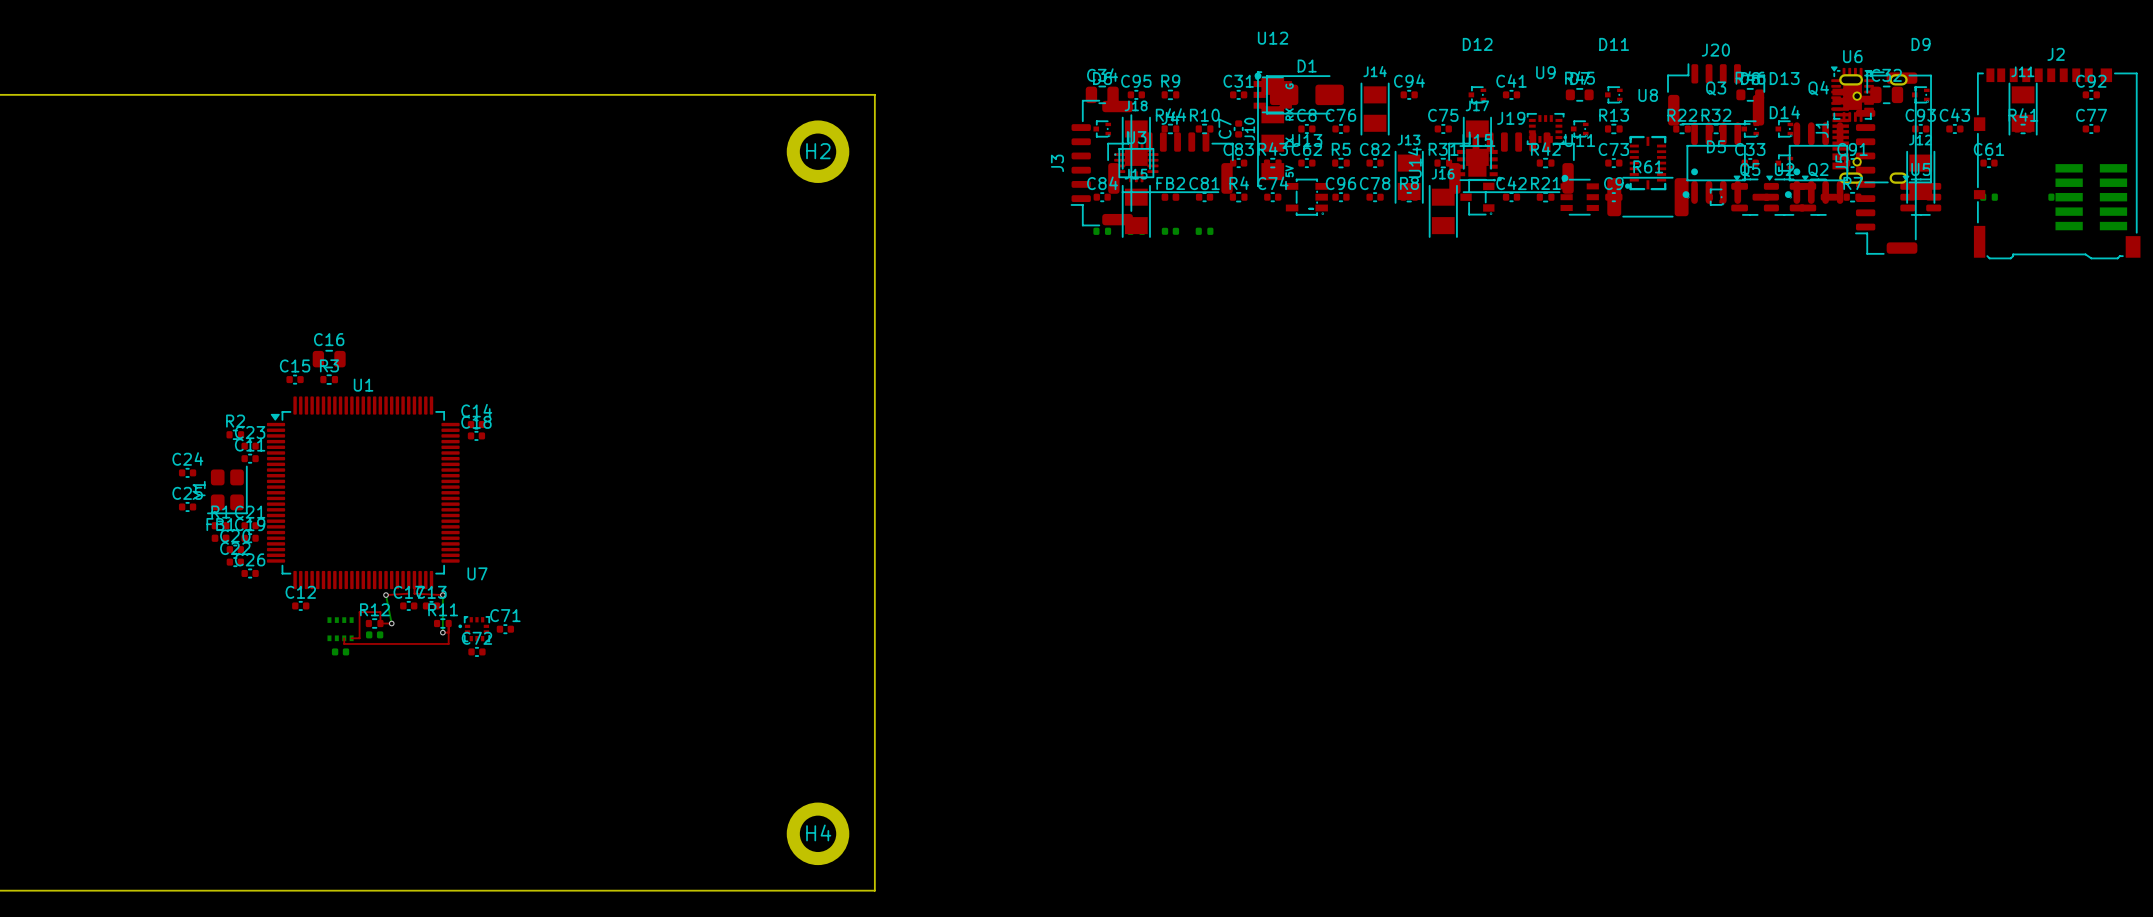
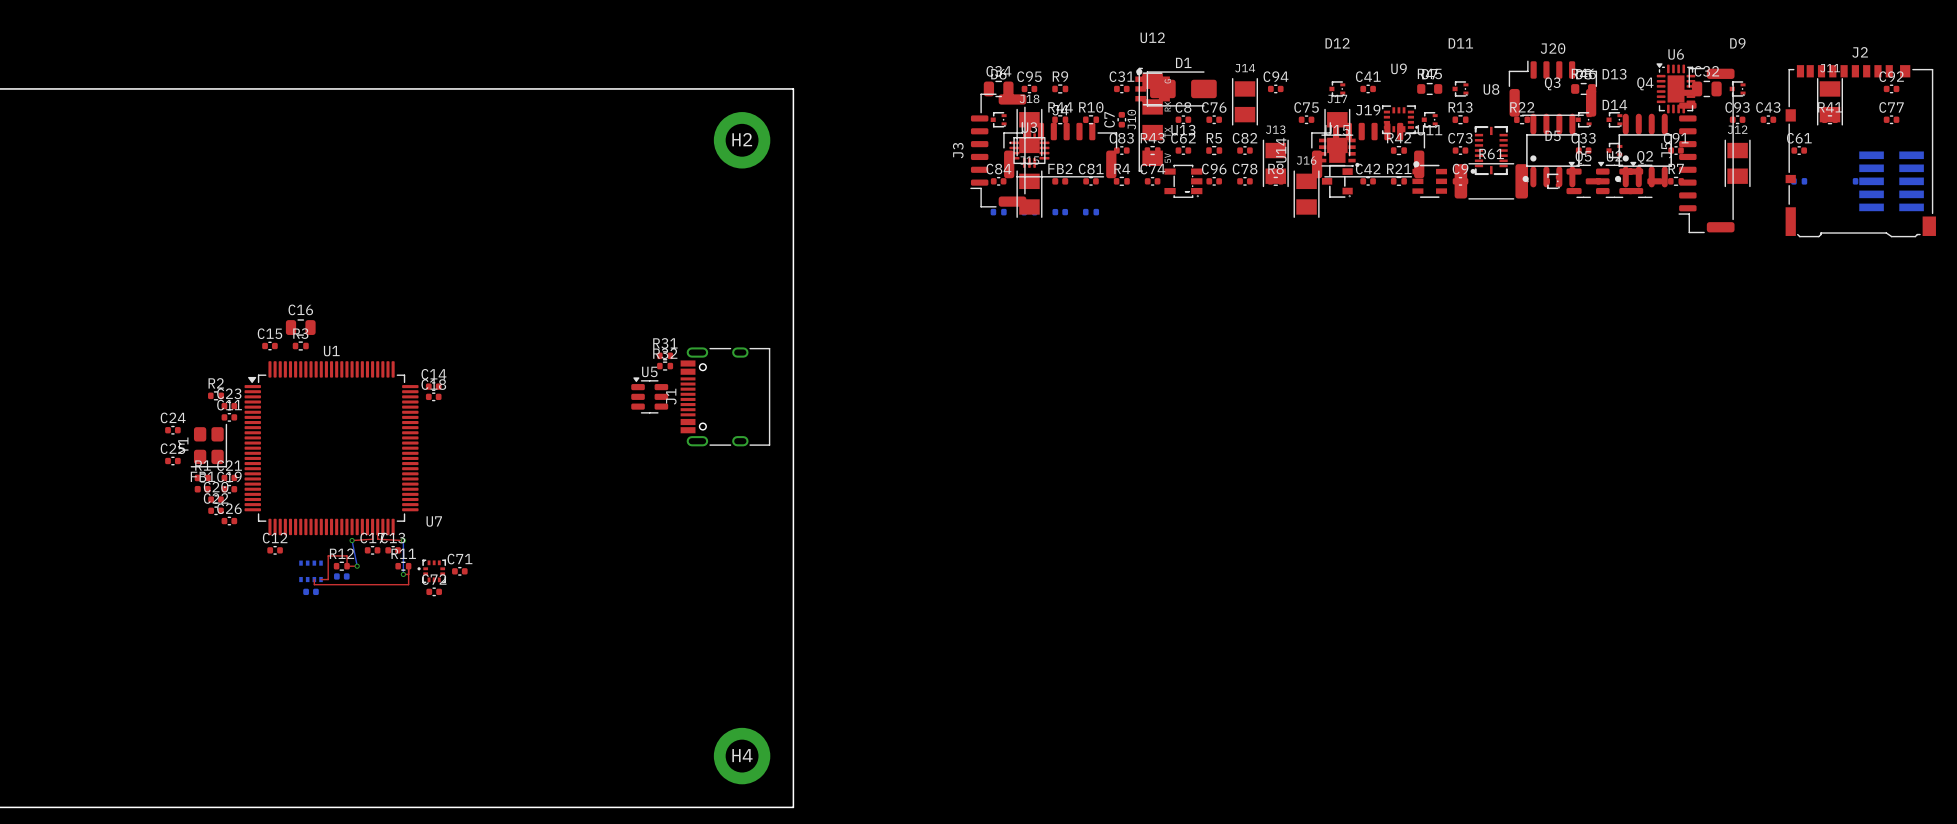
R32 position: (1716, 128) -> (665, 366)
J1 position: (1882, 128) -> (725, 396)
R31 position: (1443, 163) -> (665, 355)
U5 position: (1920, 195) -> (649, 395)

